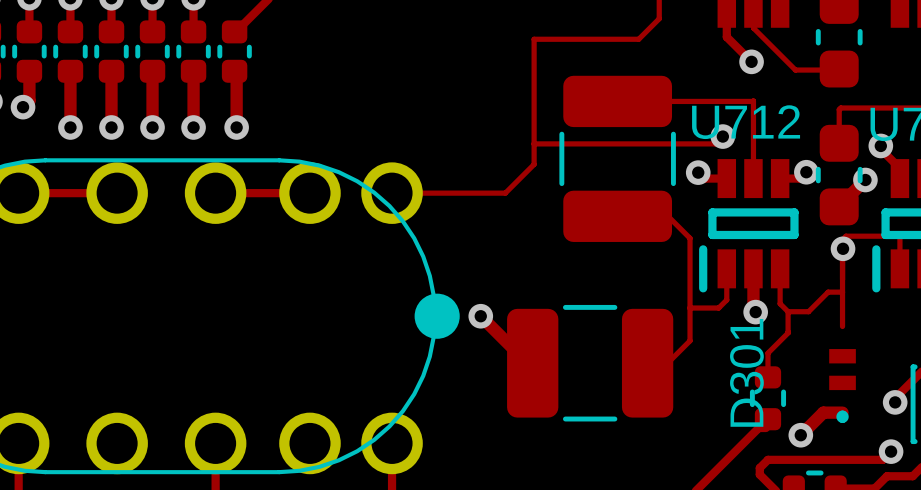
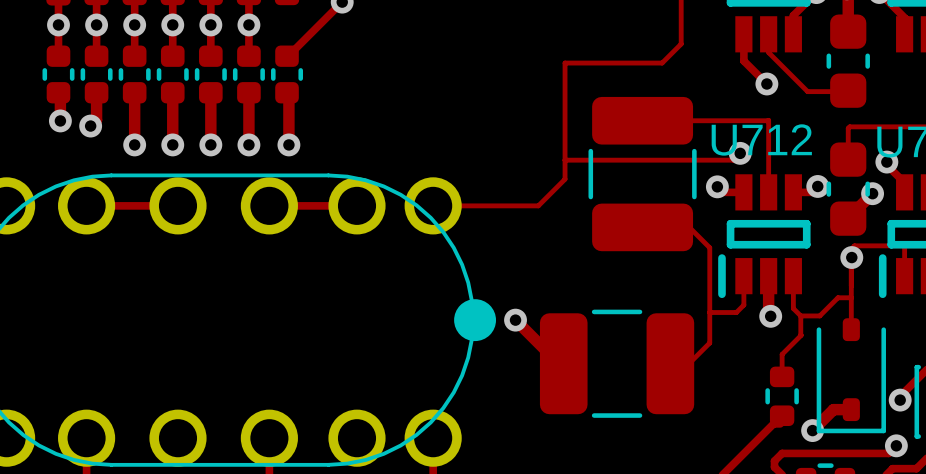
part: none -> (851, 375)
D301: (842, 385) -> none

